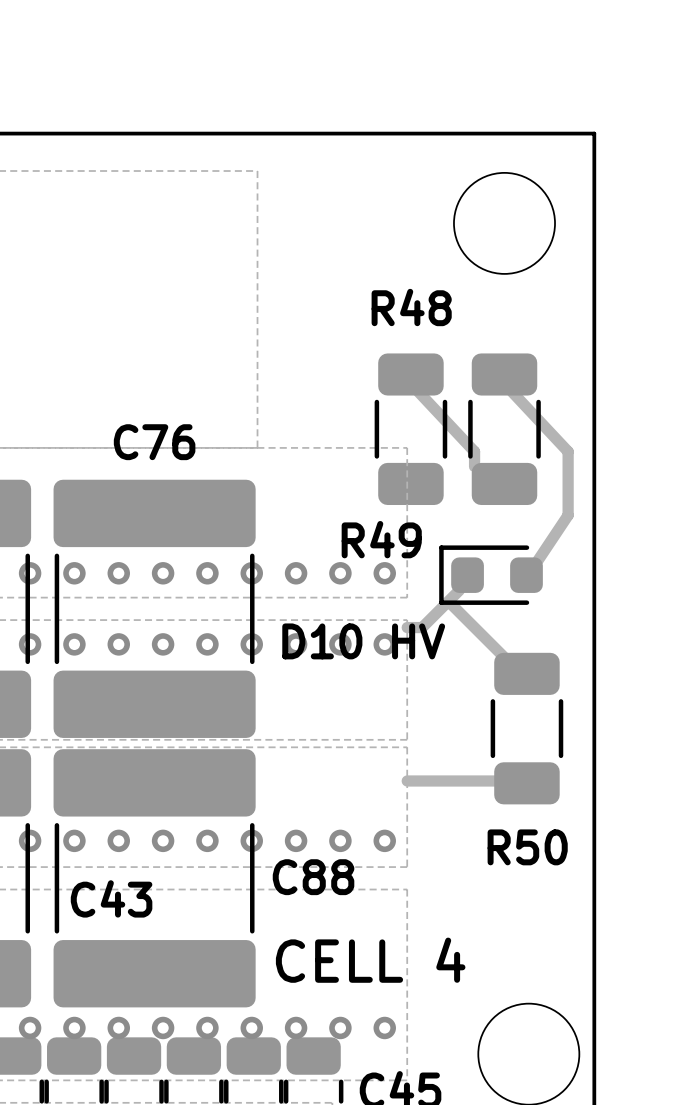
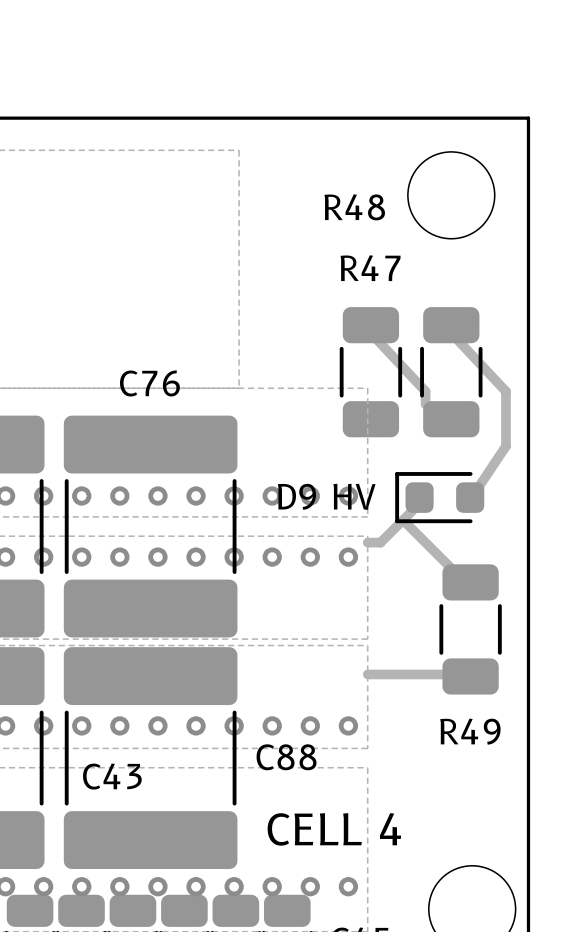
text: none -> R48 (354, 207)
text: R48 (411, 307) -> R47 (370, 268)
text: R49 (381, 539) -> none
text: none -> D9 HV (326, 496)
text: D10 HV (363, 641) -> none
text: R50 (527, 847) -> R49 (470, 731)

